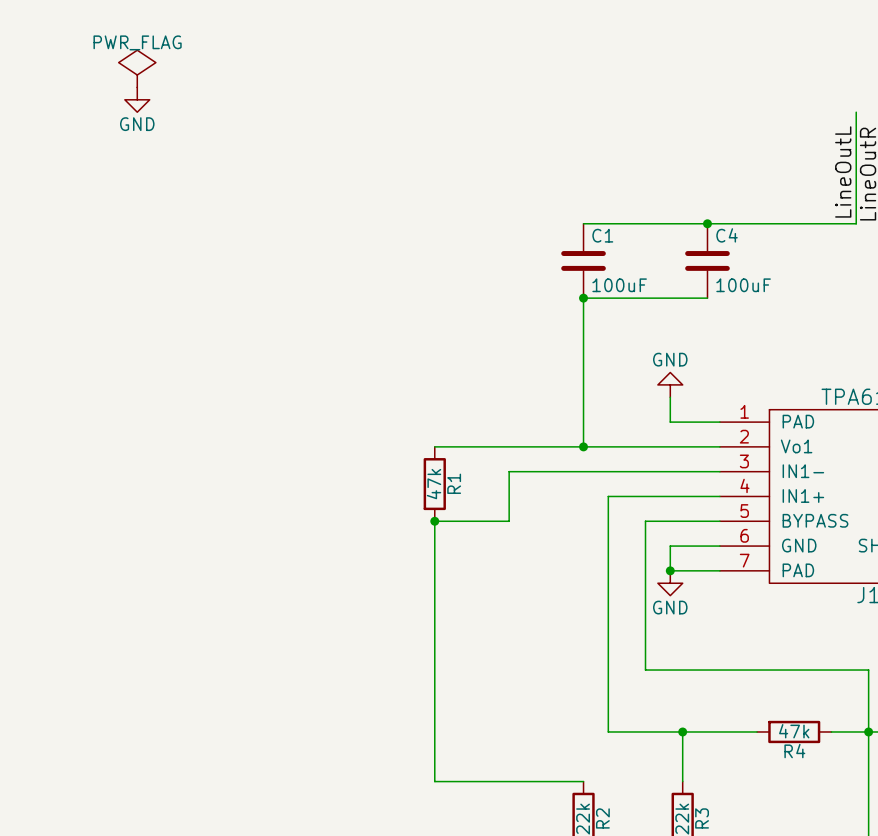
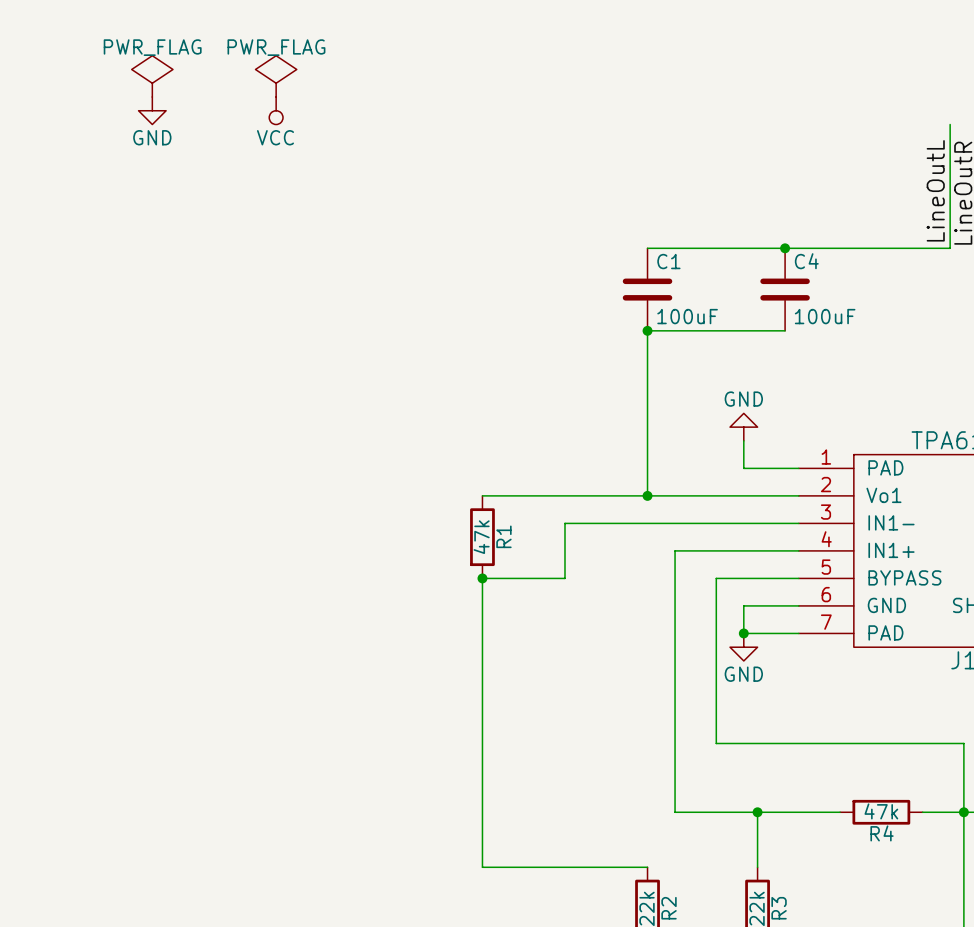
power symbol: none -> PWR_FLAG (276, 76)
power symbol: none -> VCC (276, 110)

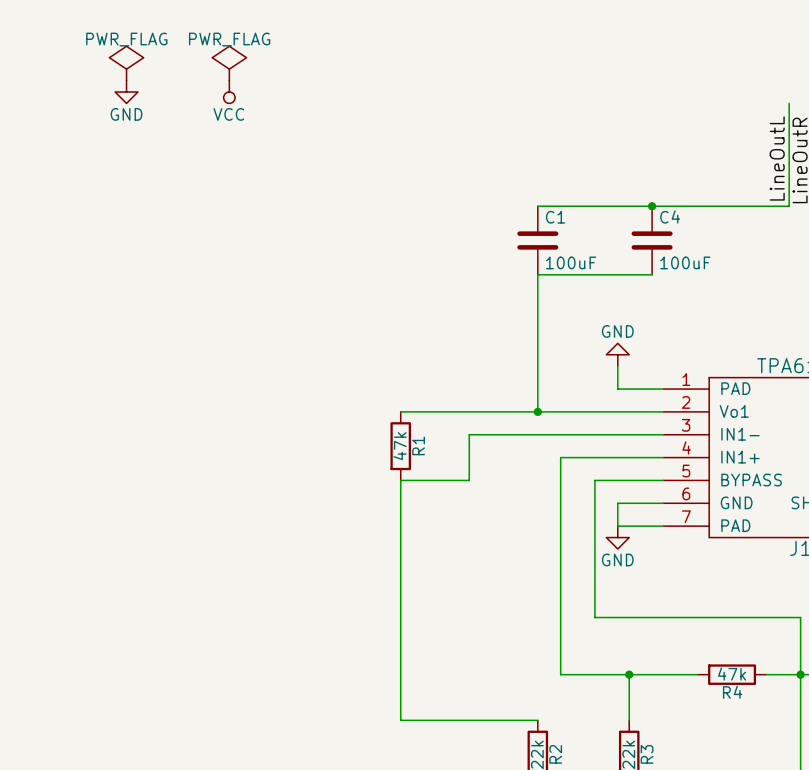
junction: (647, 330) -> none
junction: (482, 578) -> none
junction: (743, 633) -> none

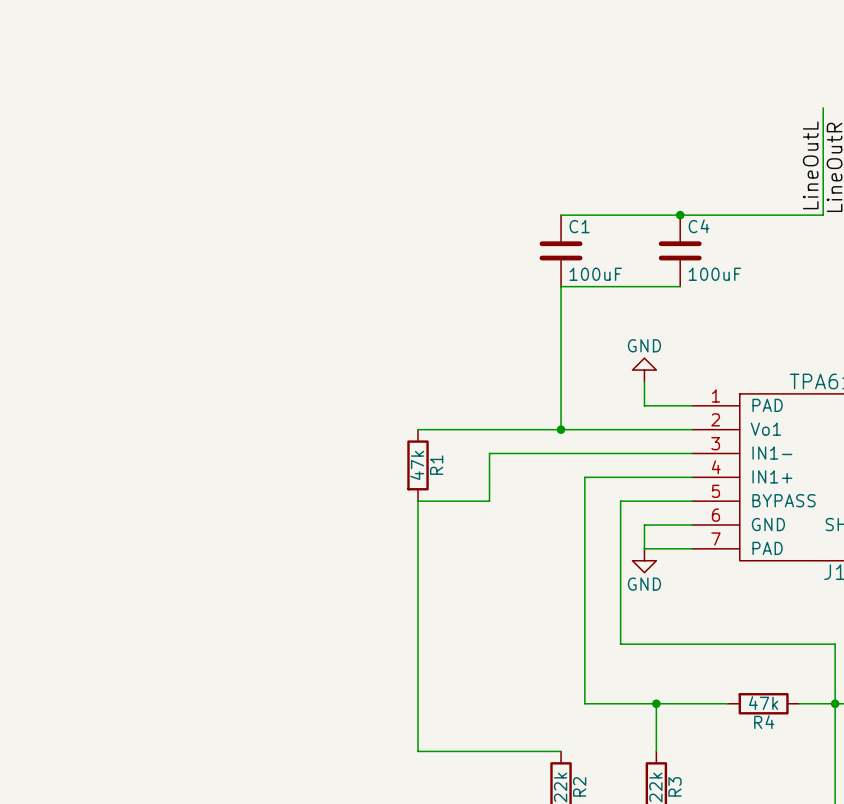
power symbol: PWR_FLAG (126, 63) -> none
power symbol: PWR_FLAG (229, 63) -> none
power symbol: GND (126, 91) -> none
power symbol: VCC (229, 91) -> none

